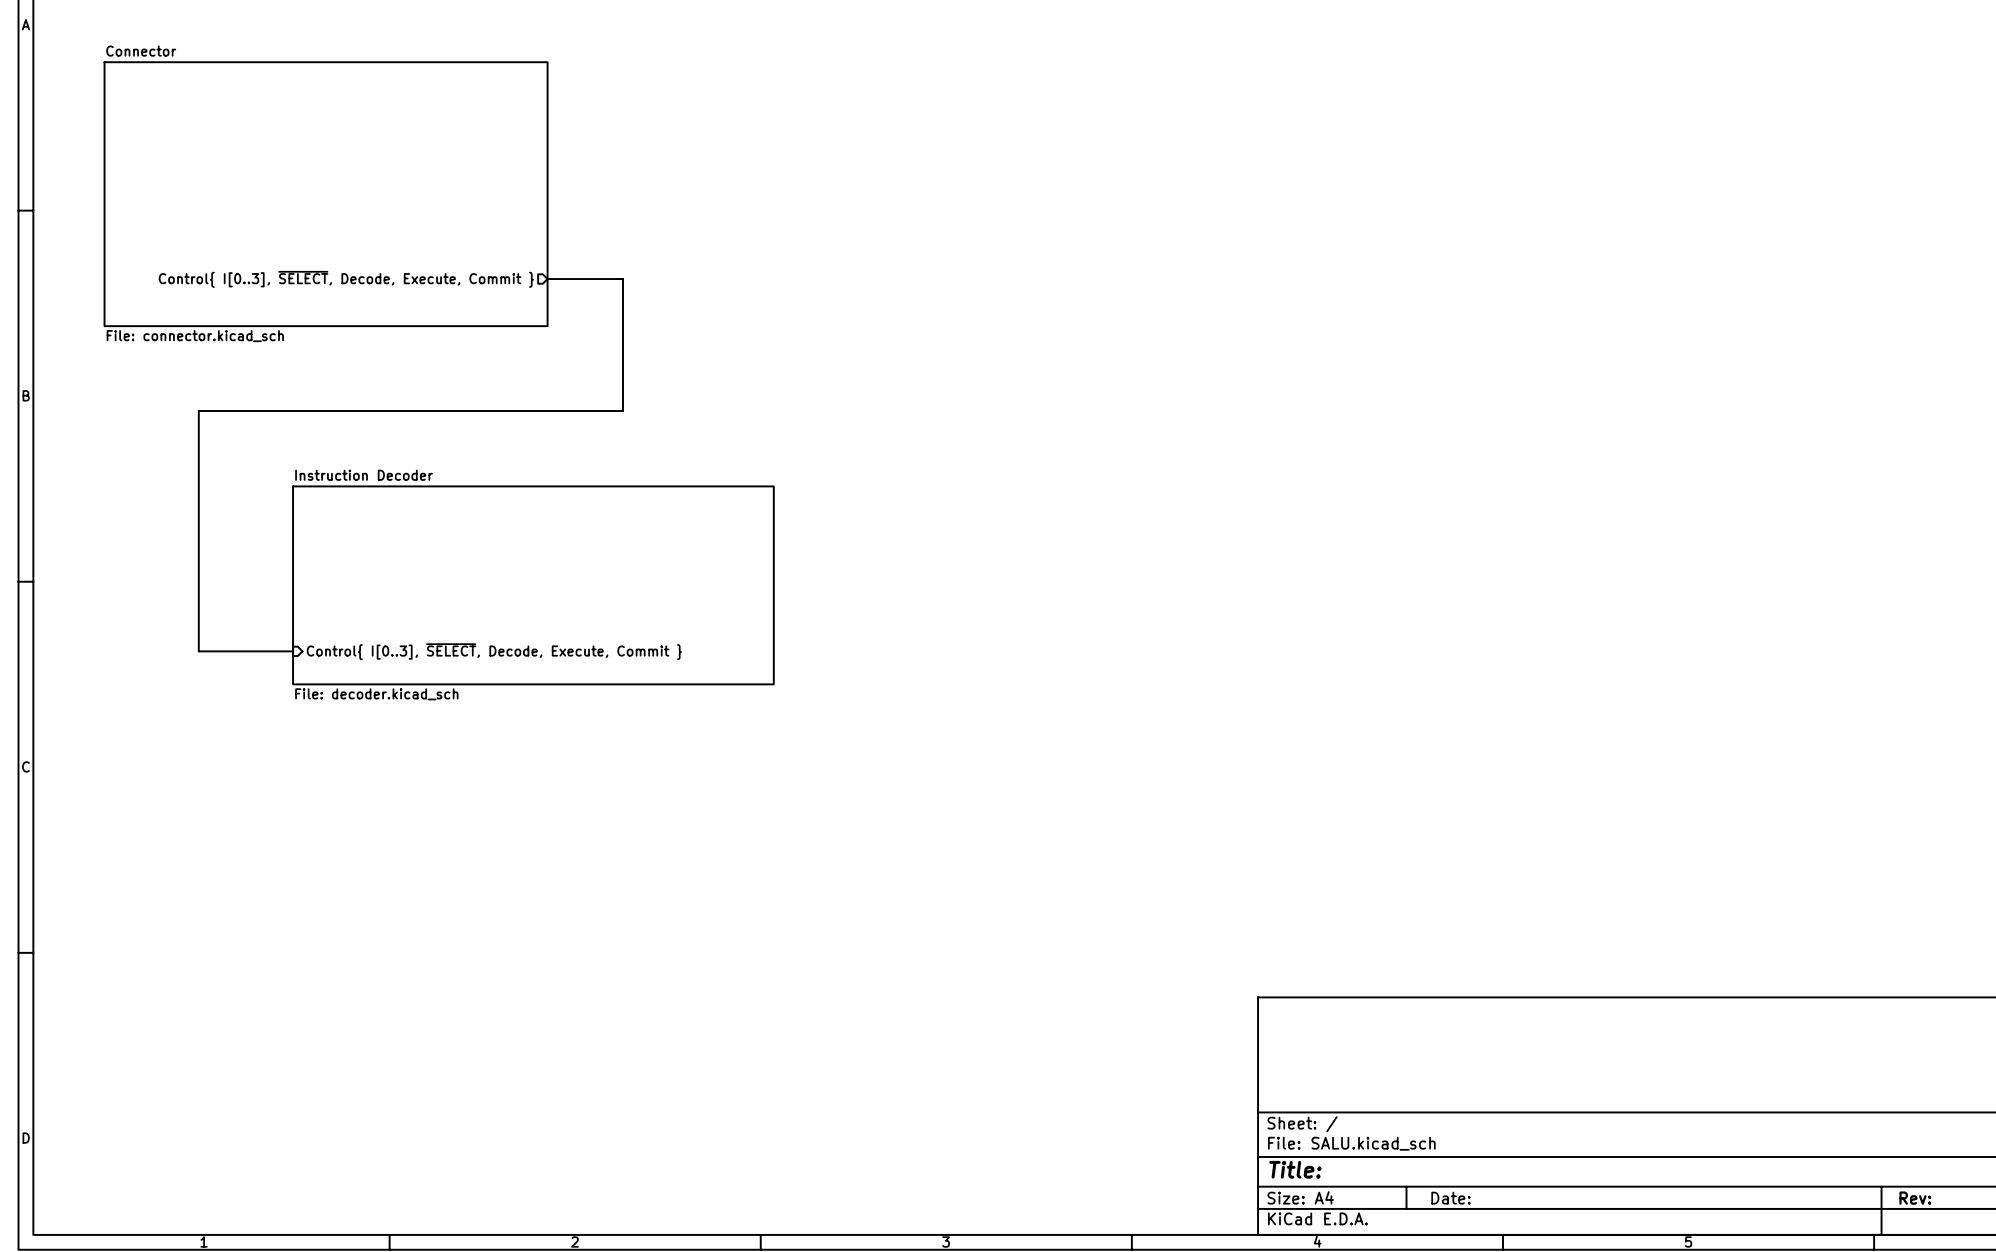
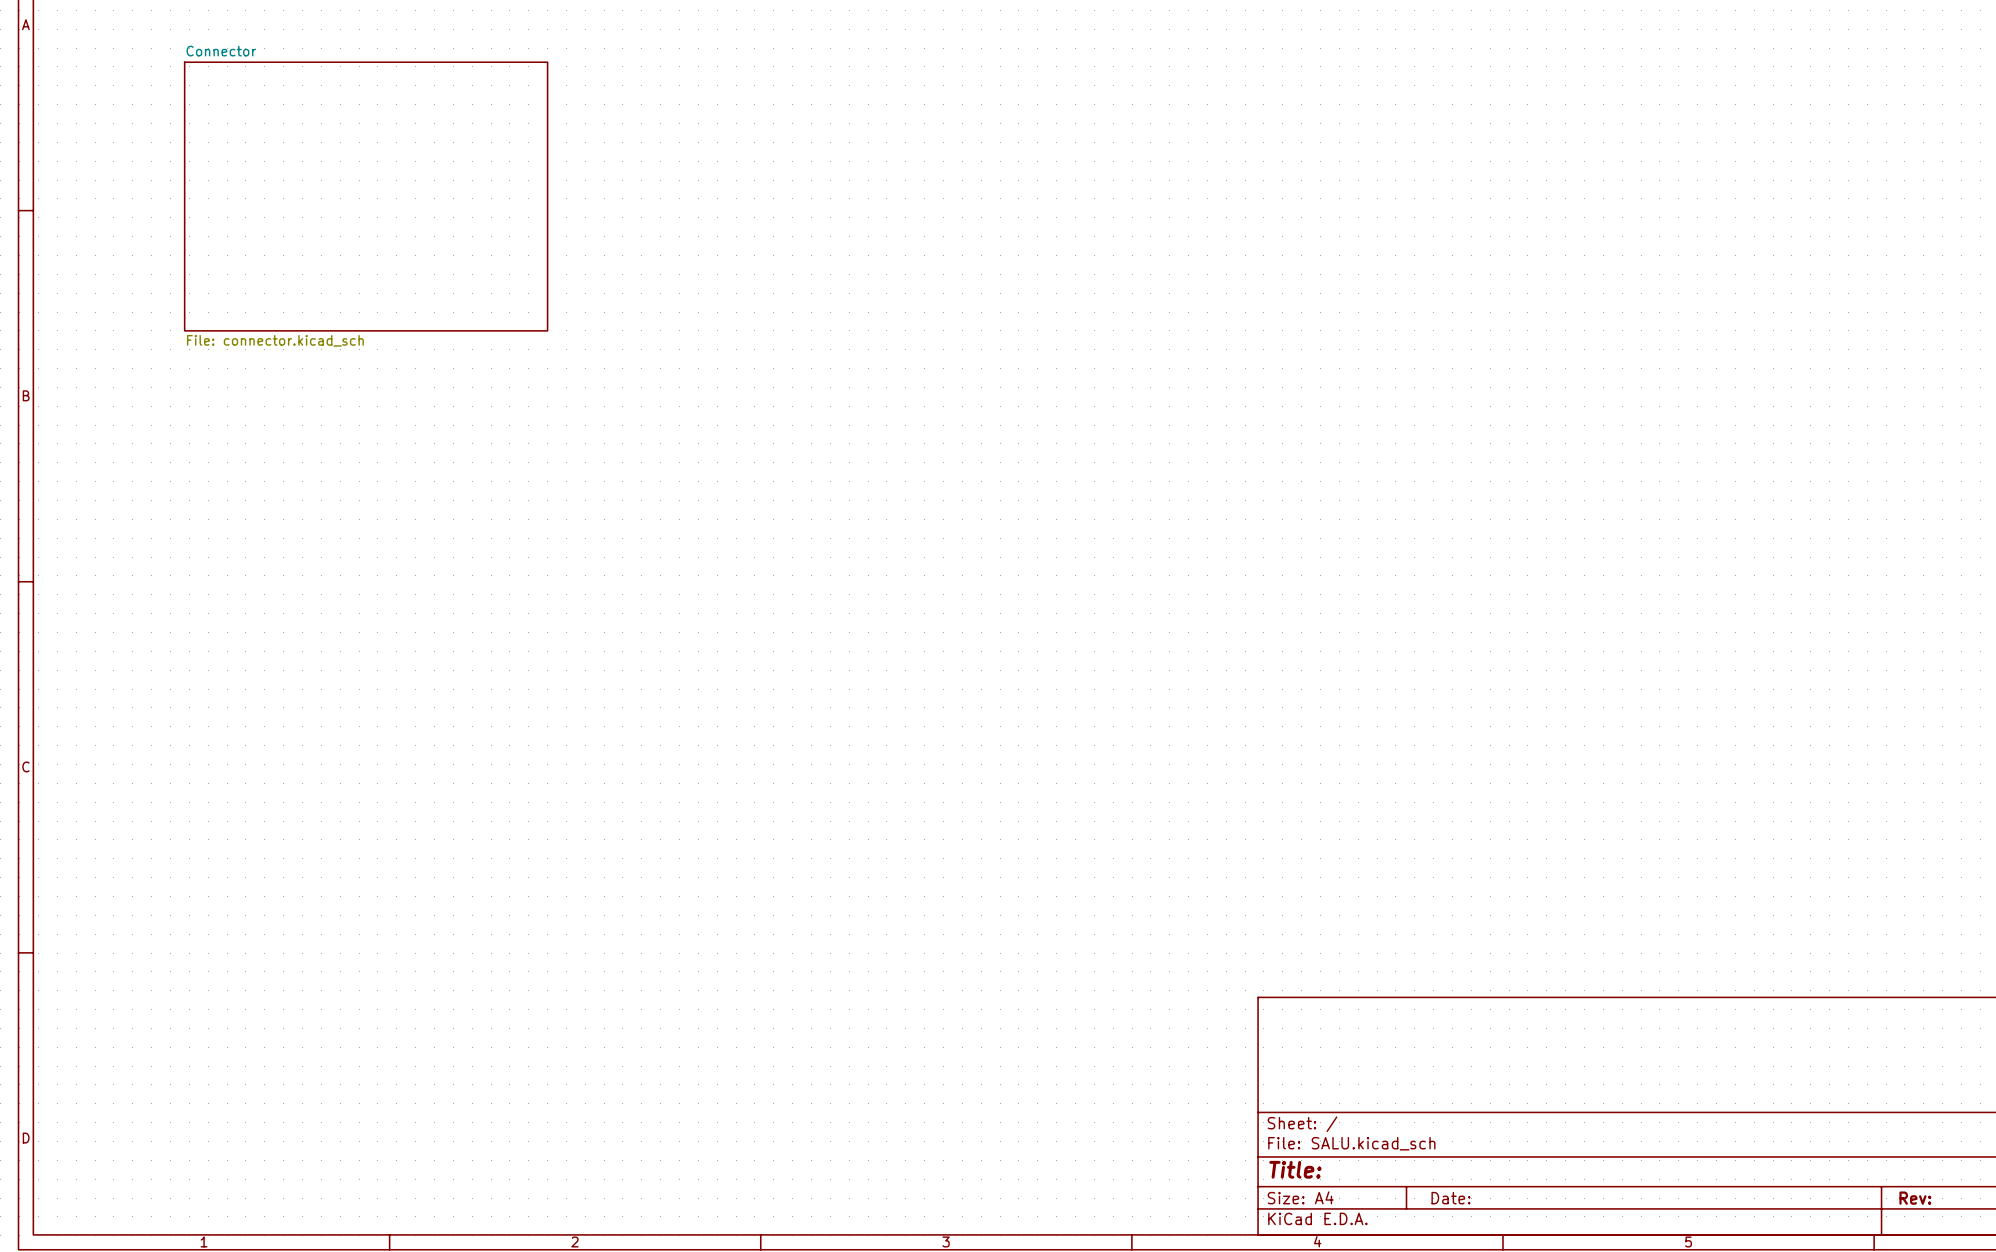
sheet Connector: File: connector.kicad_sch (326, 194) -> none
sheet Connector: none -> File: connector.kicad_sch (366, 196)
sheet pin: Control{ I[0..3], ~{SELECT}, Decode, Execute, Commit } (346, 279) -> none
bus: (547, 279) (622, 279) (622, 410) (198, 410) (198, 651) (293, 651) -> none
sheet Instruction Decoder: File: decoder.kicad_sch (533, 585) -> none
sheet pin: Control{ I[0..3], ~{SELECT}, Decode, Execute, Commit } (494, 651) -> none

